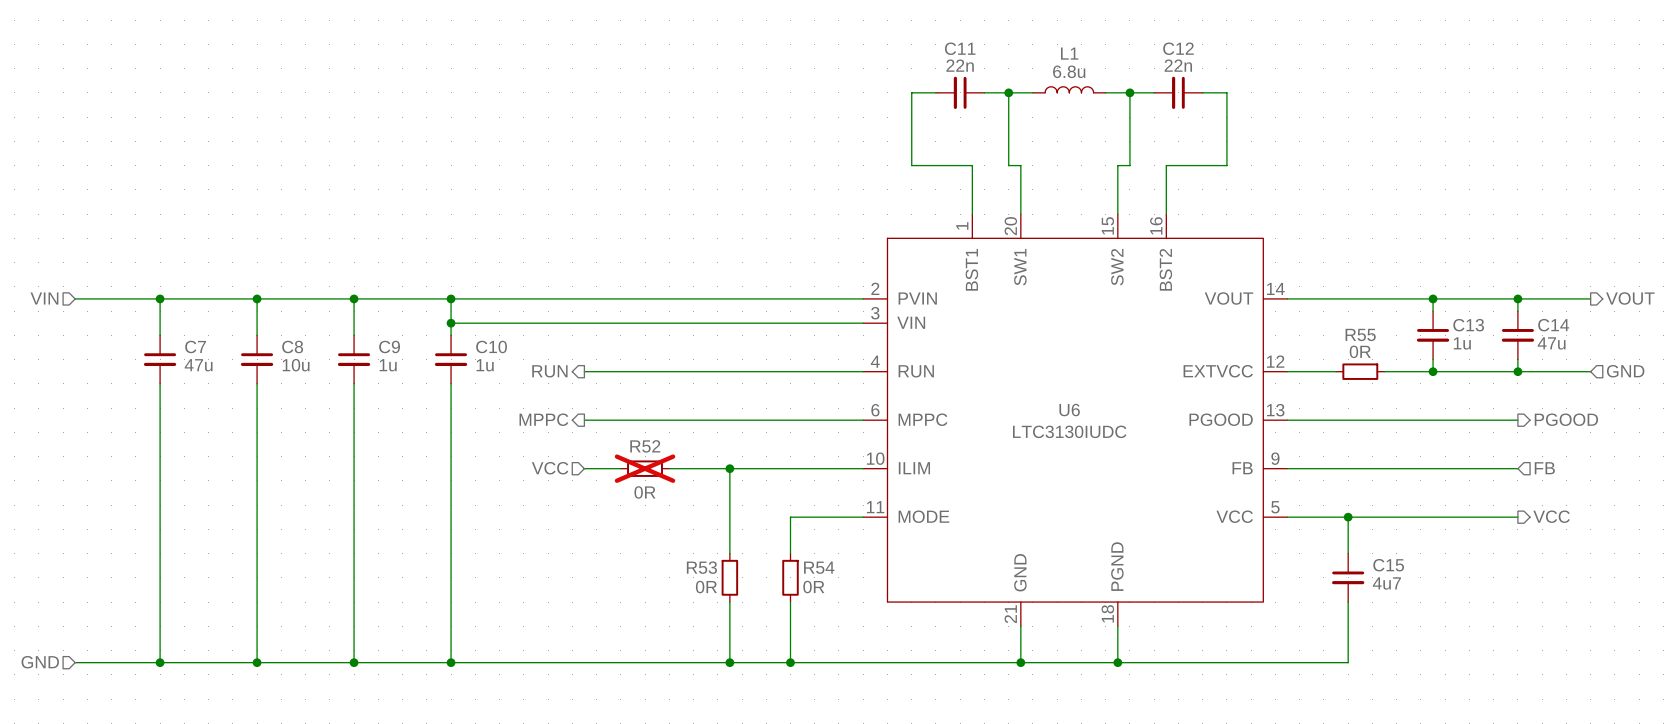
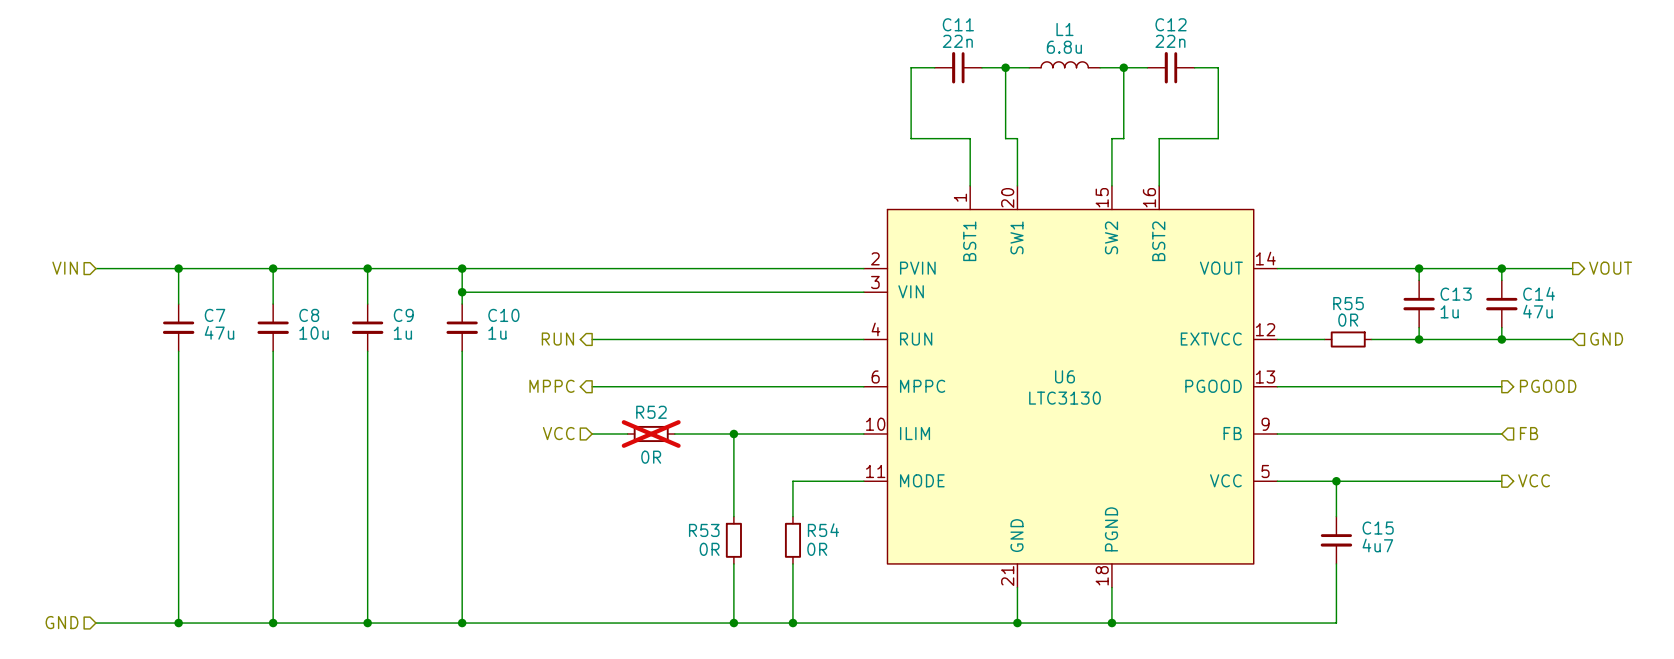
U6 value: LTC3130IUDC (1069, 431) -> LTC3130 (1064, 398)

